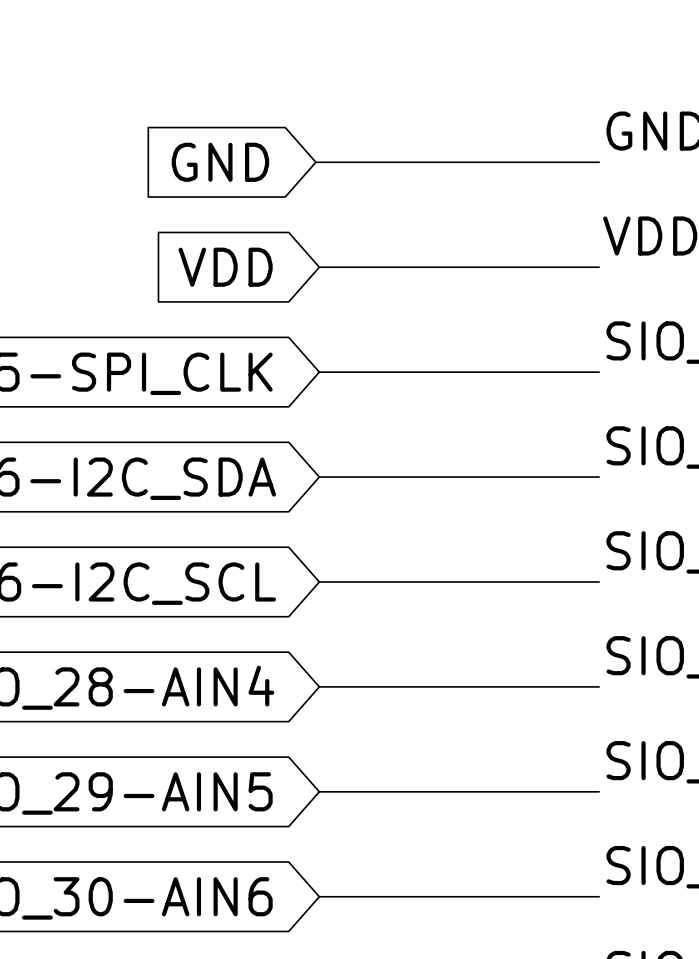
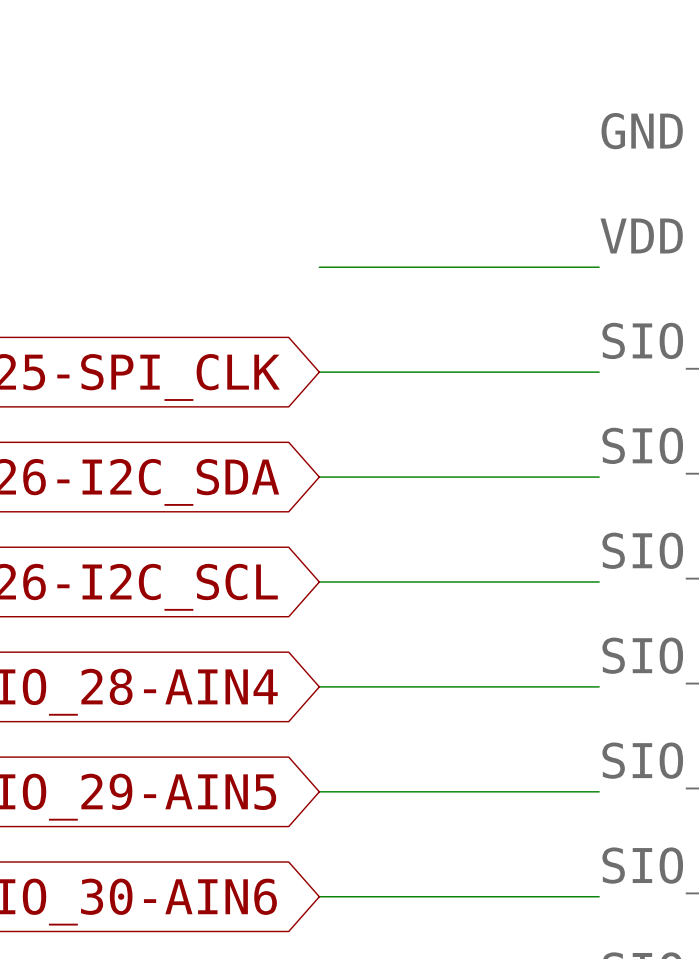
global label: GND (220, 162) -> none
wire: (315, 162) (599, 162) -> none
global label: VDD (225, 267) -> none

